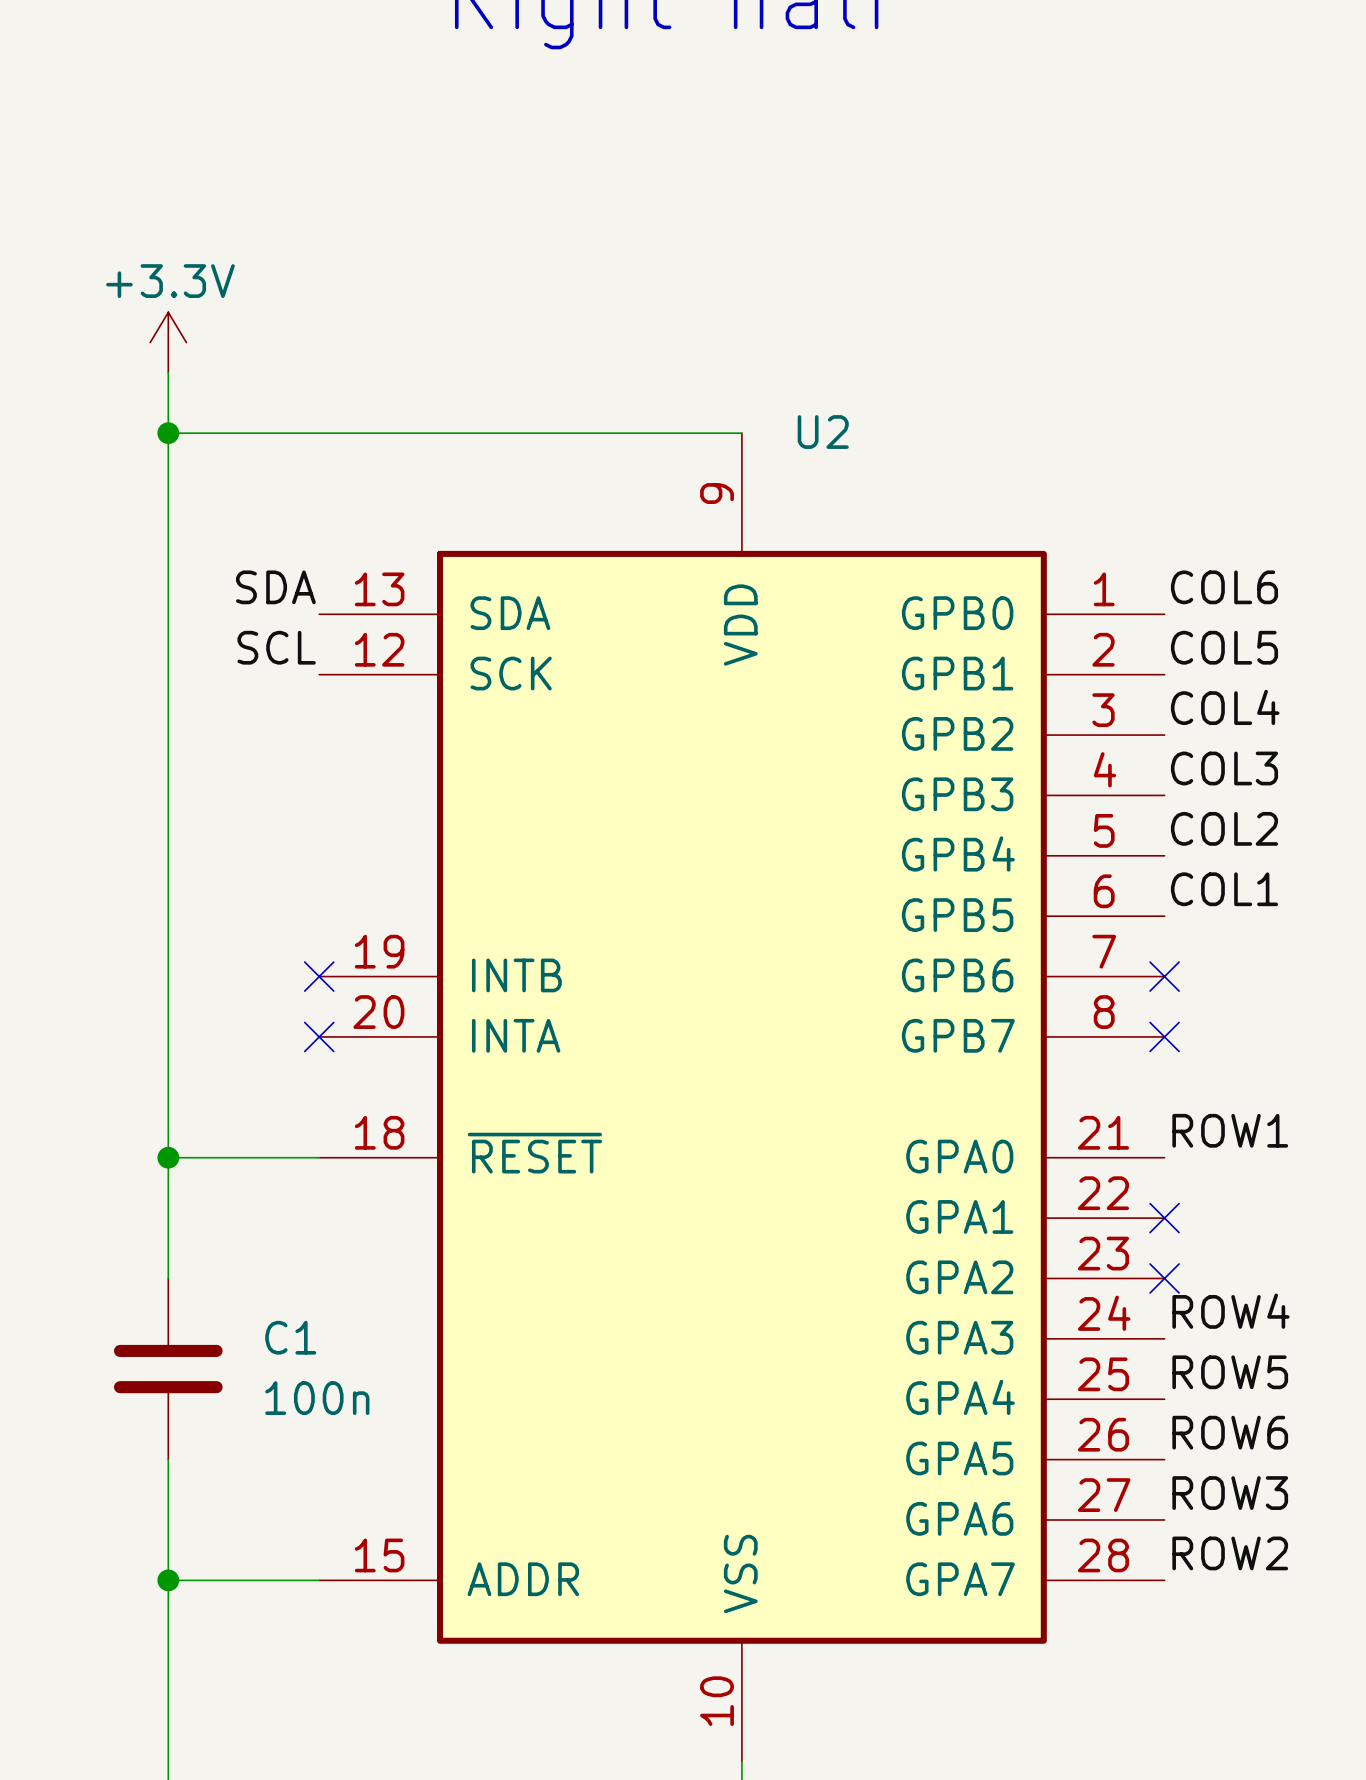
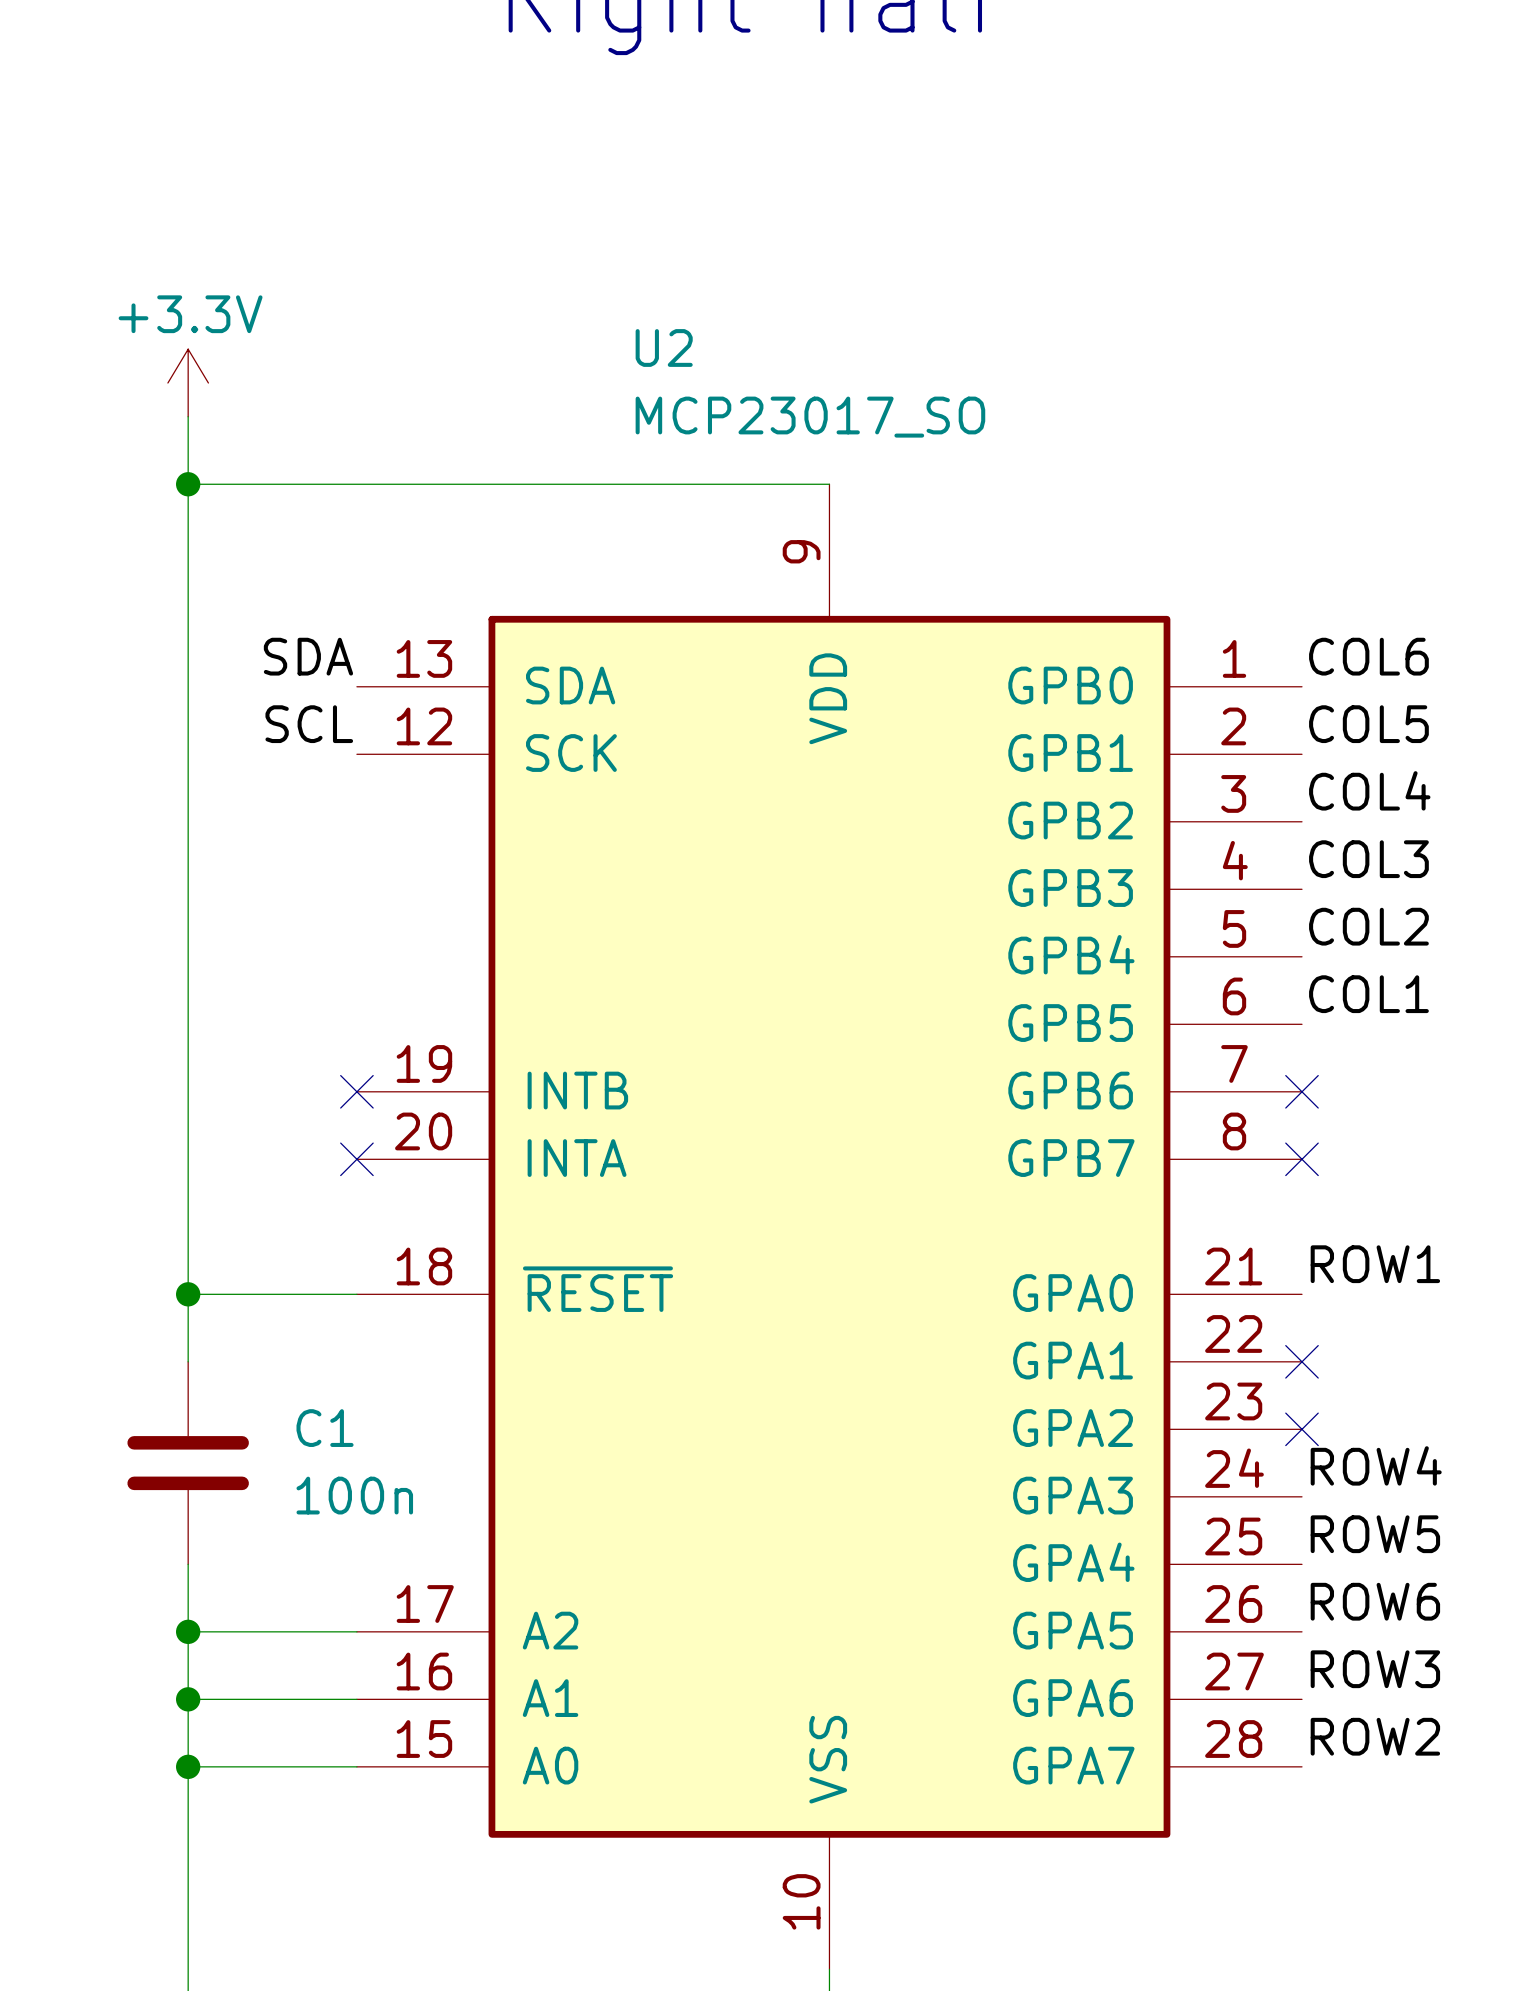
U2 value: none -> MCP23017_SO (810, 417)
U2 name position: U2 (823, 432) -> U2 (664, 347)
U2 symbol: [319, 433, 1165, 1762] -> [356, 484, 1303, 1970]
C1 position: (168, 1369) -> (188, 1463)
wire: none -> (188, 1564) (188, 1631) (356, 1631)
junction: none -> (188, 1631)
wire: none -> (188, 1699) (356, 1699)
junction: none -> (188, 1699)

